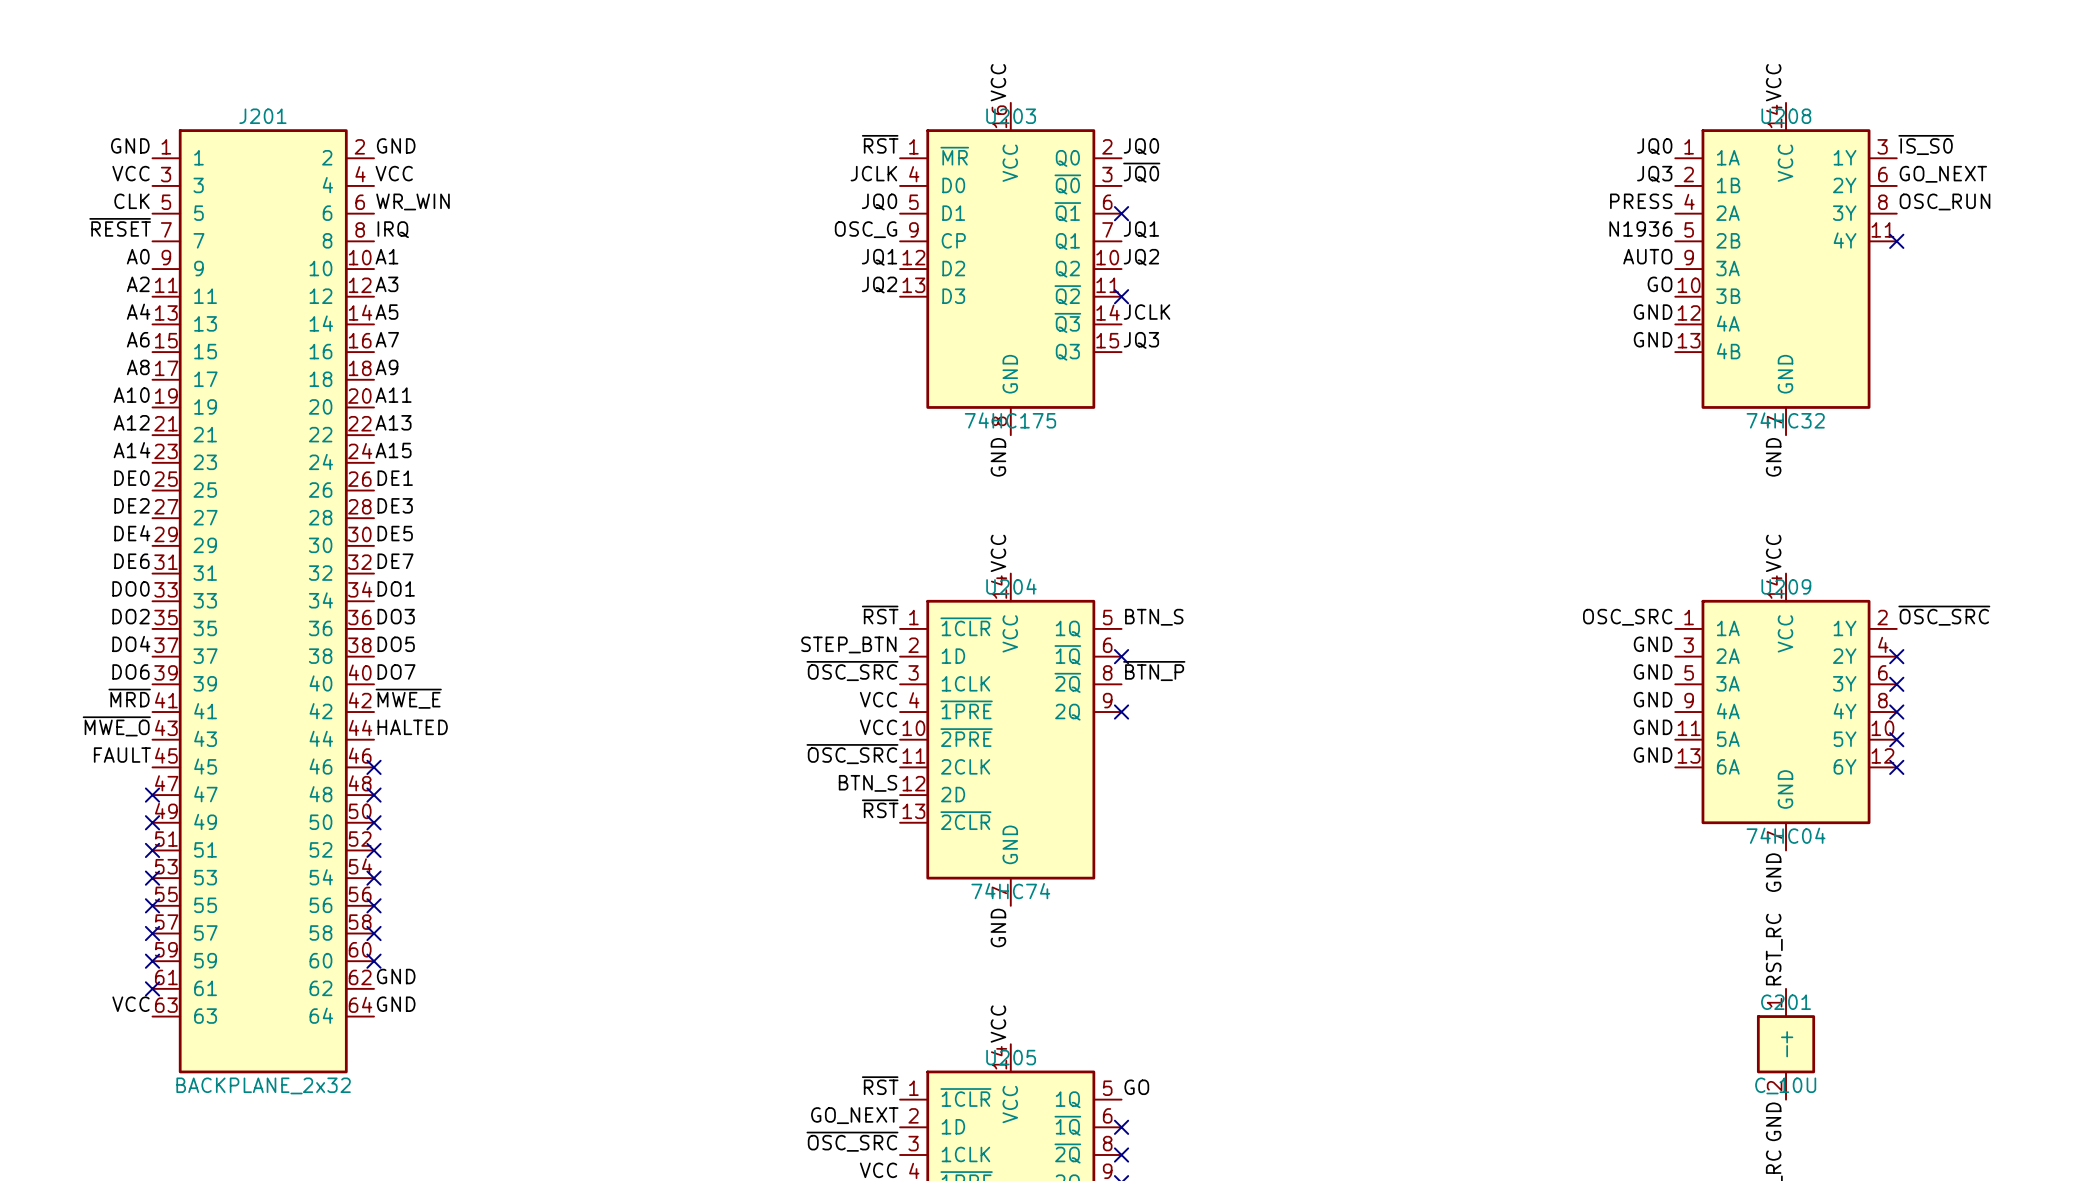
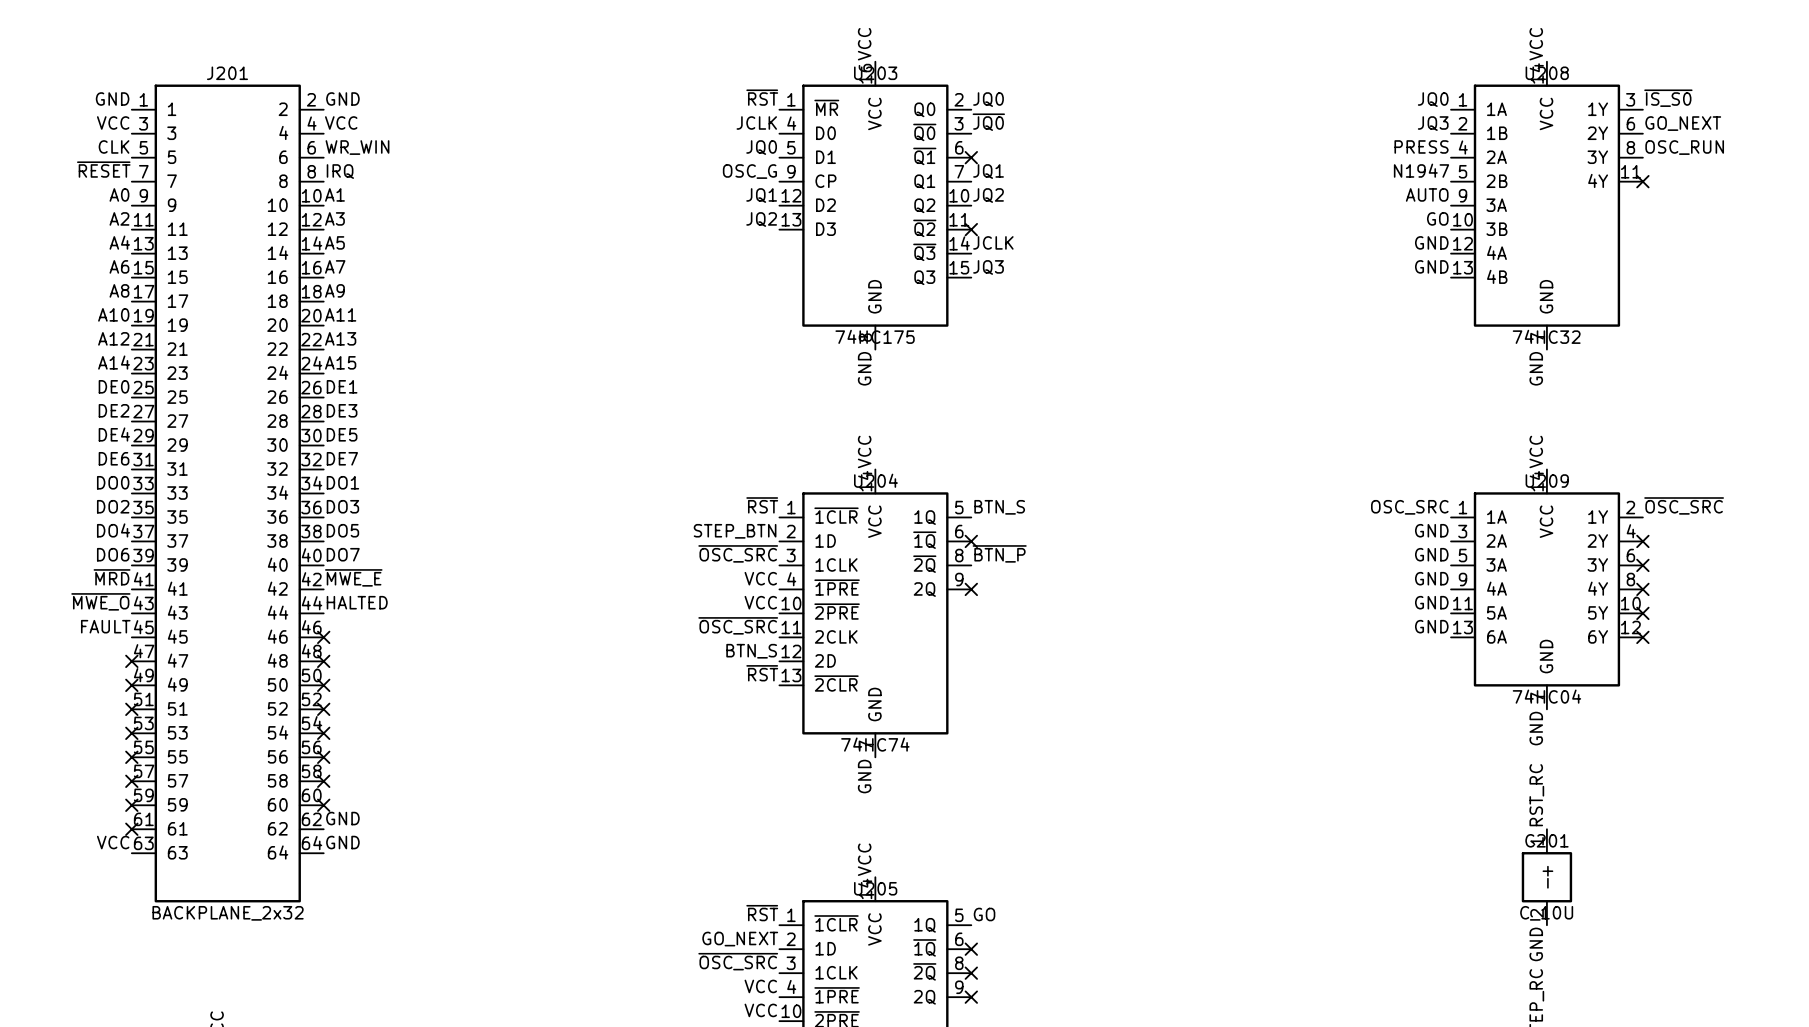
label: N1936 (1640, 228) -> N1947 (1421, 170)

